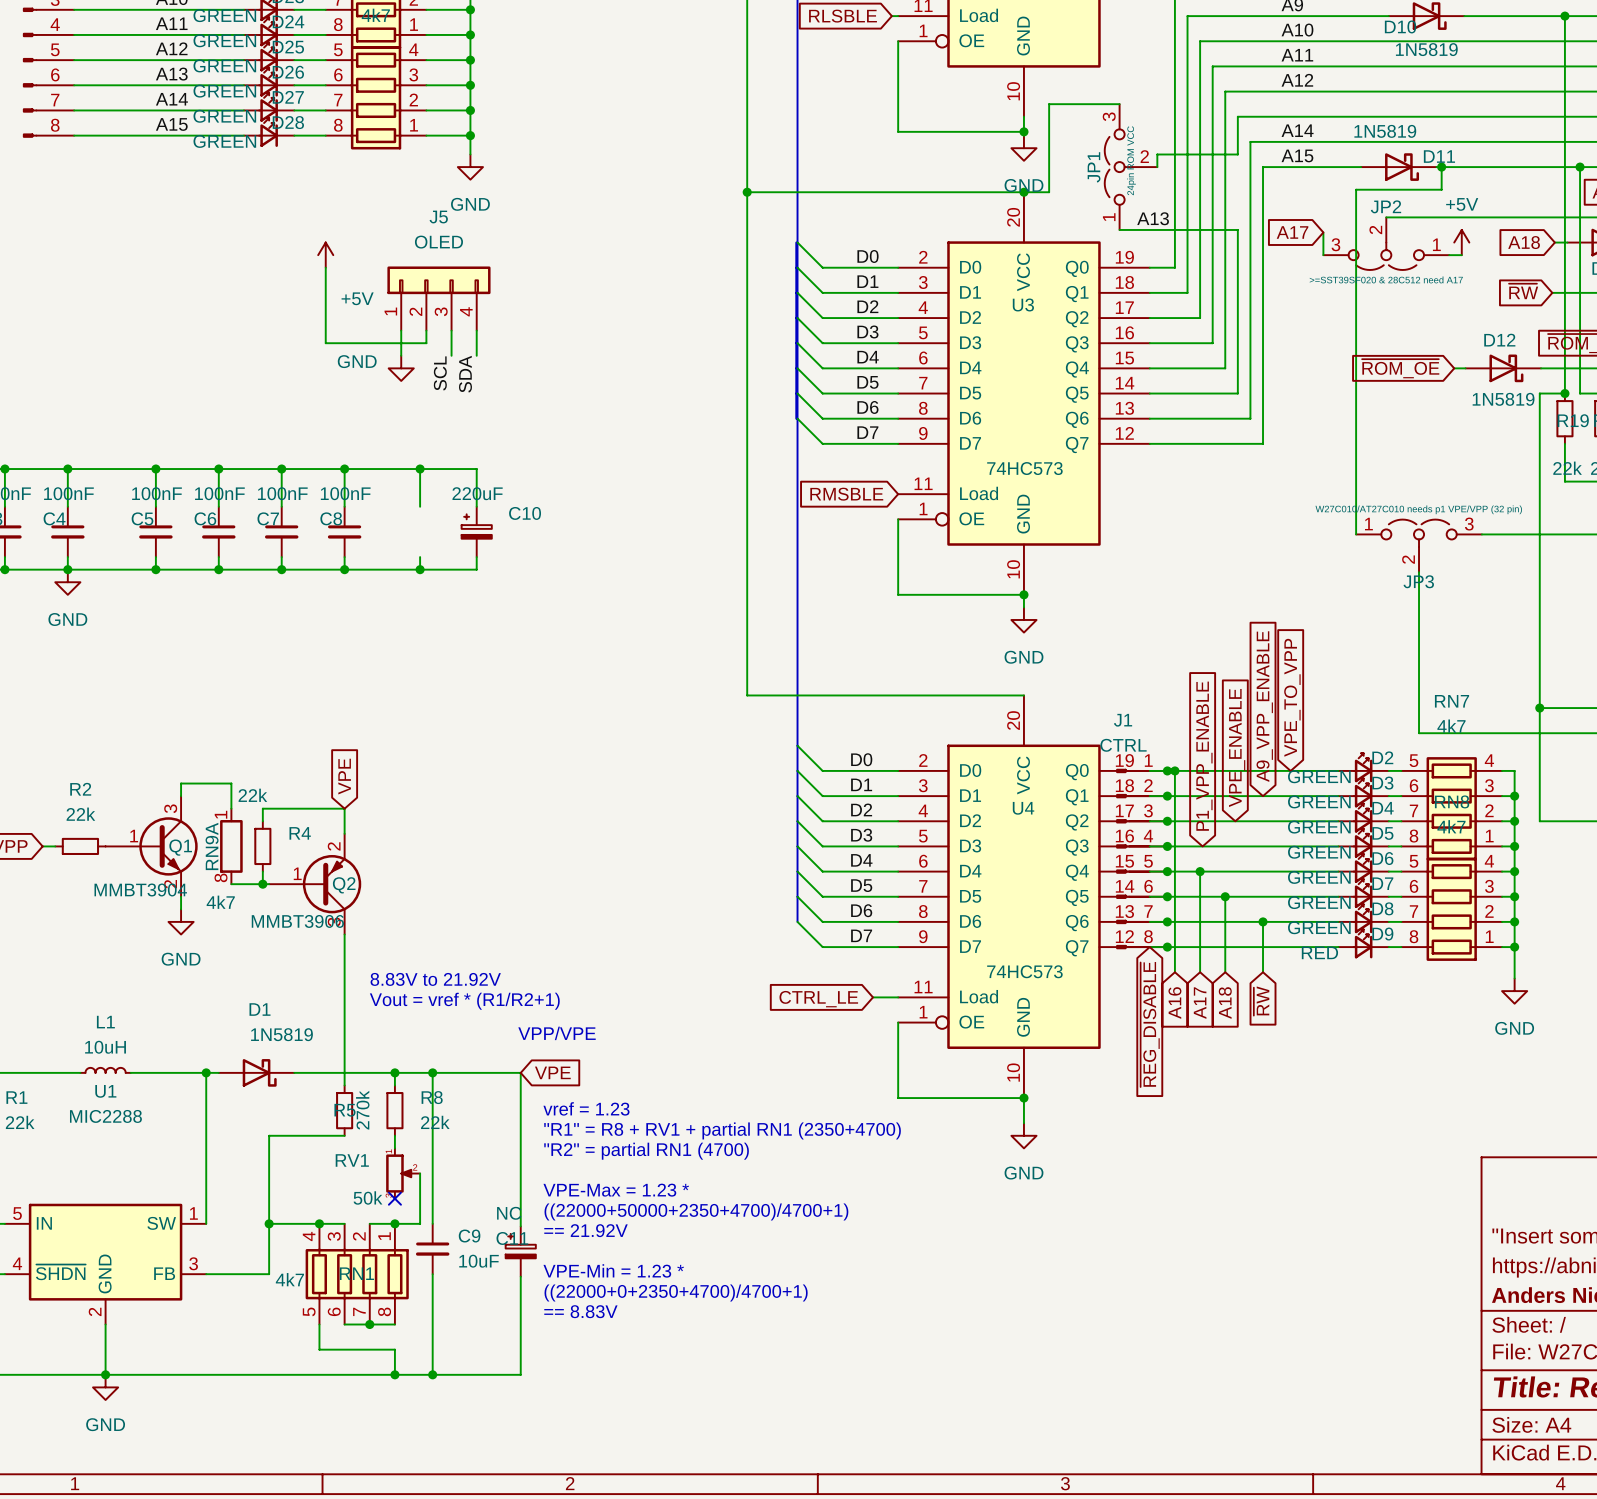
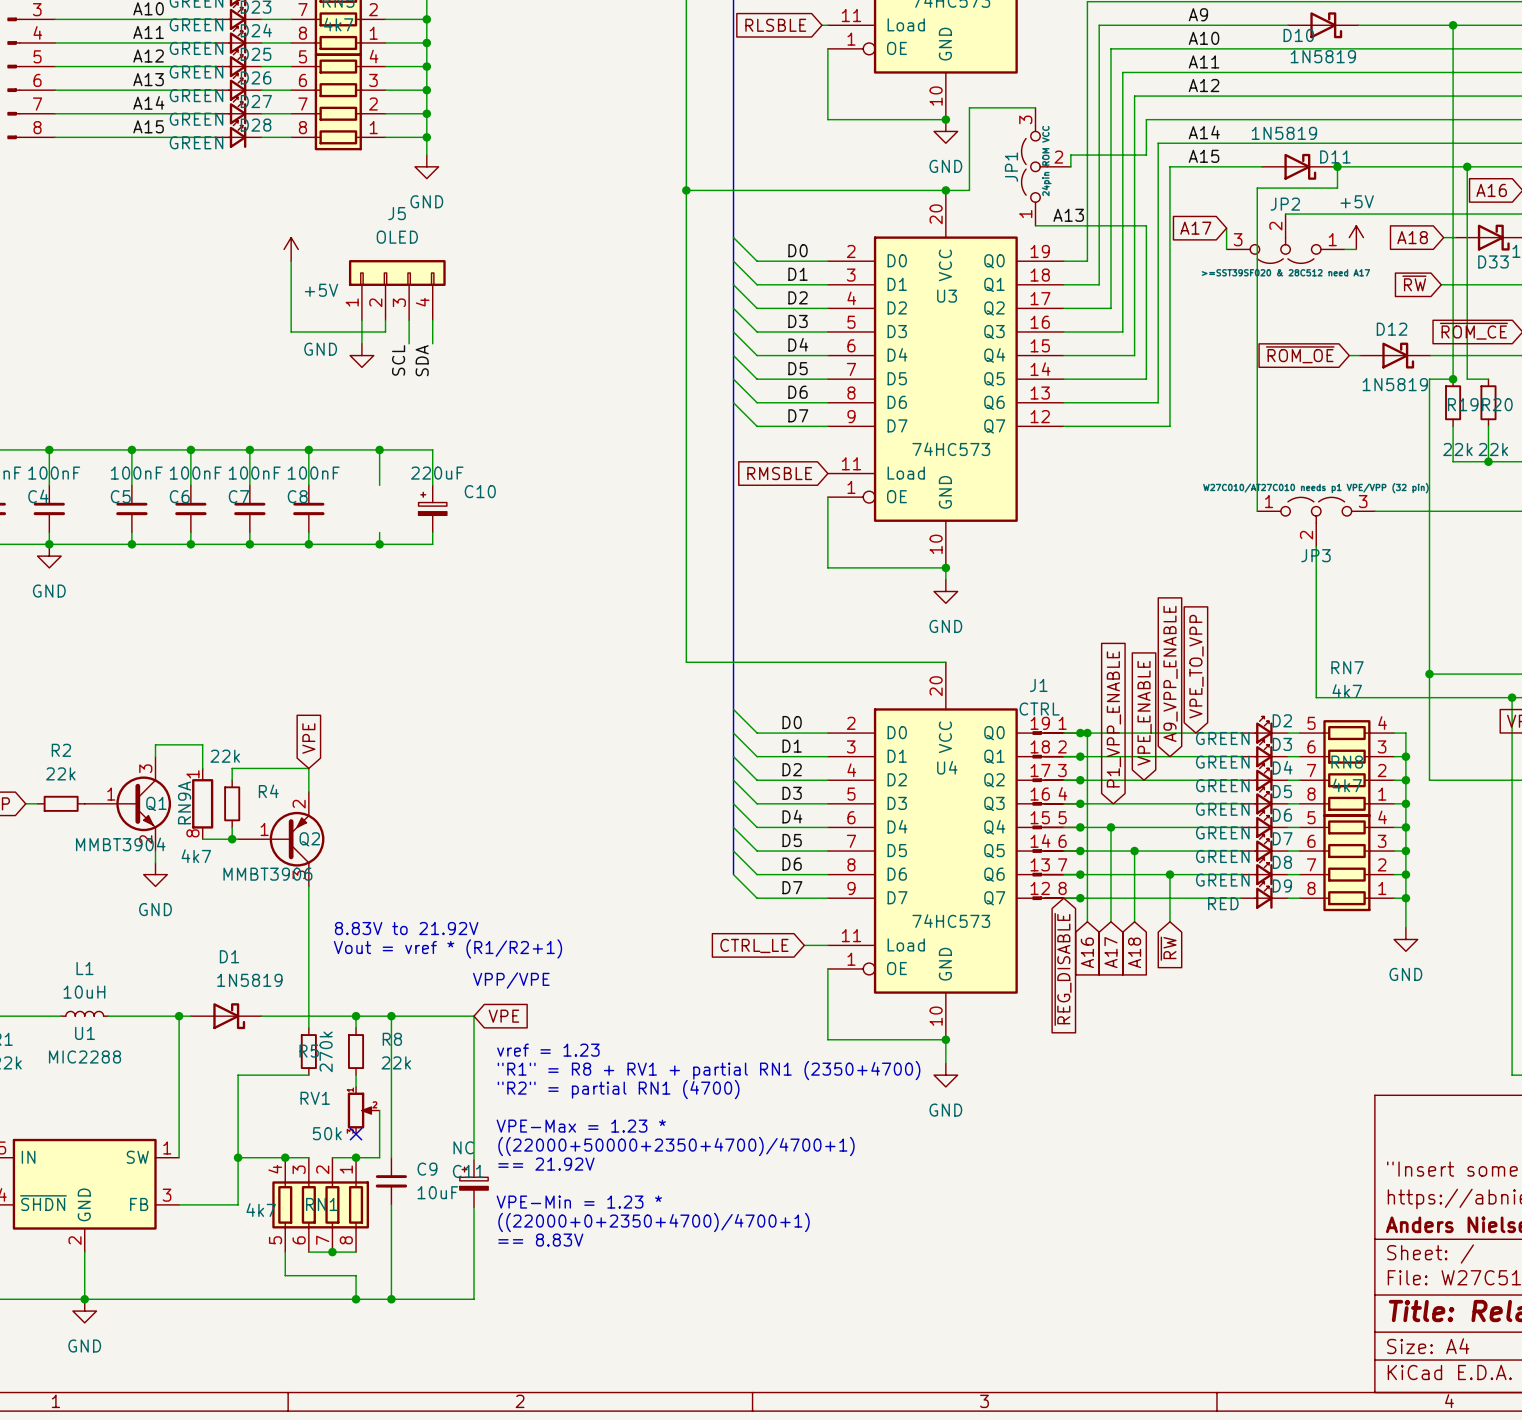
wire: (898, 116) (898, 131) (1023, 131) -> (827, 119) (945, 119)
junction position: (1023, 131) -> (945, 119)
power symbol position: GND (1023, 148) -> GND (945, 131)
bus: (796, 242) (796, 418) -> none

